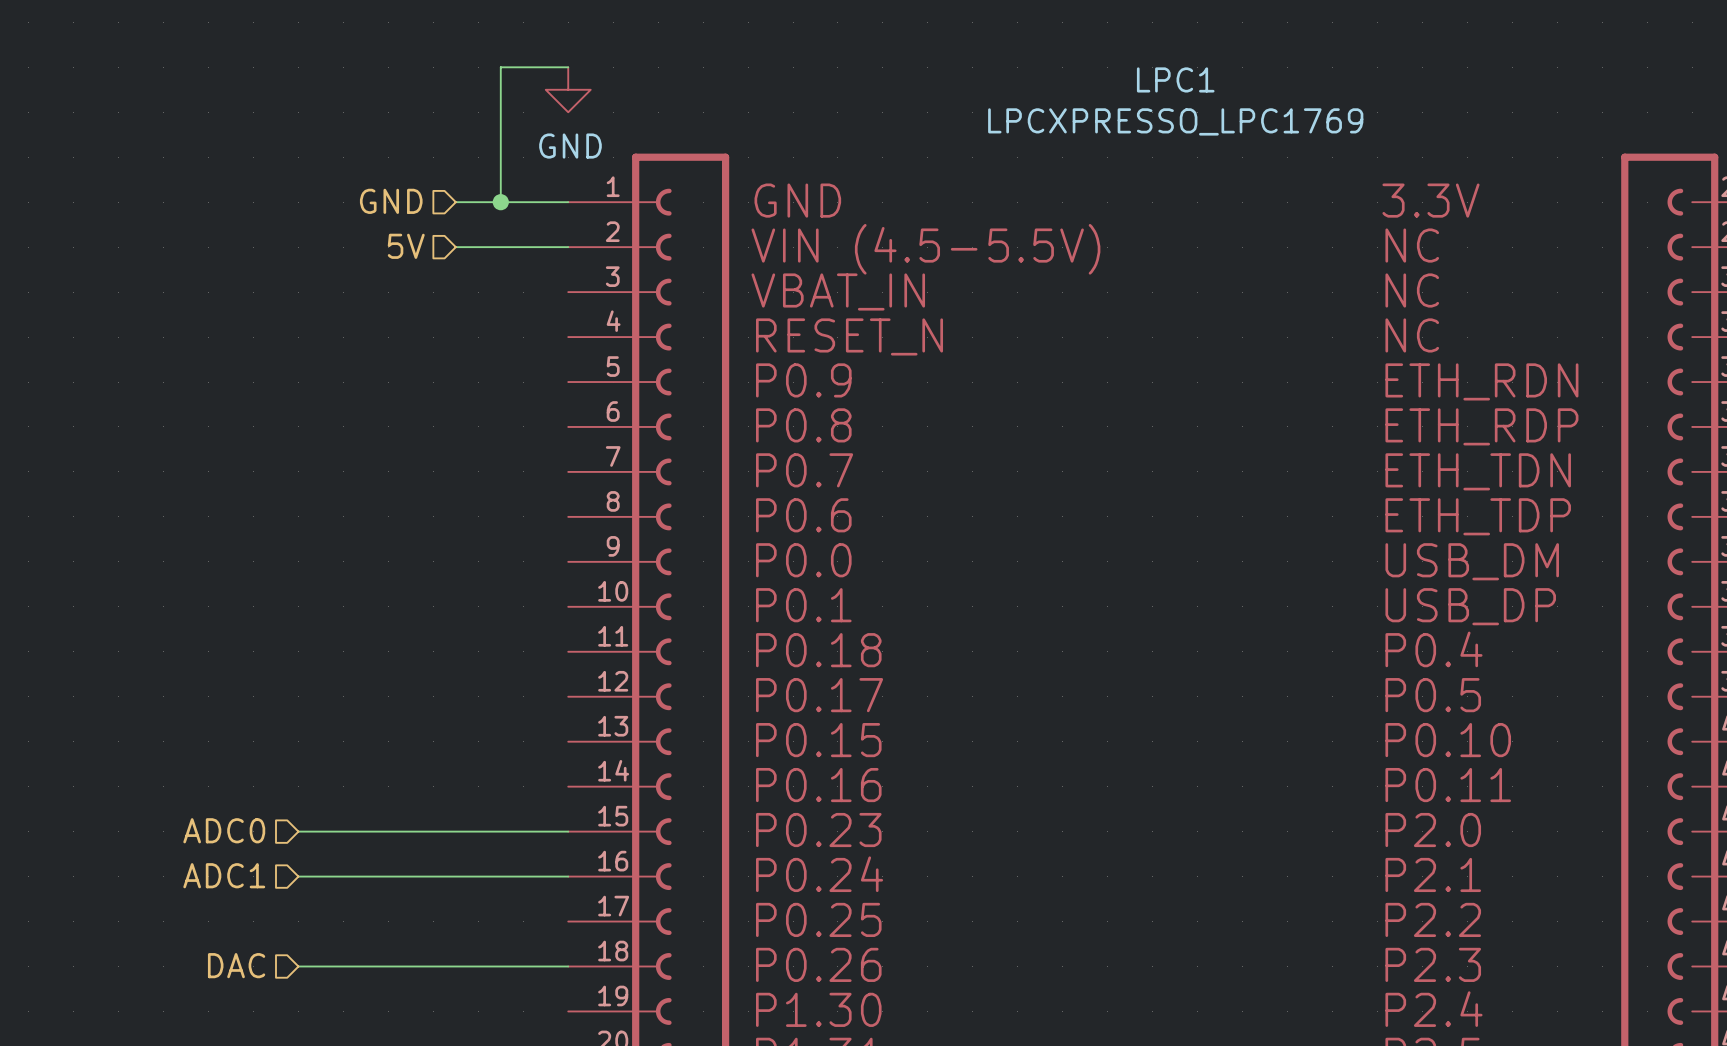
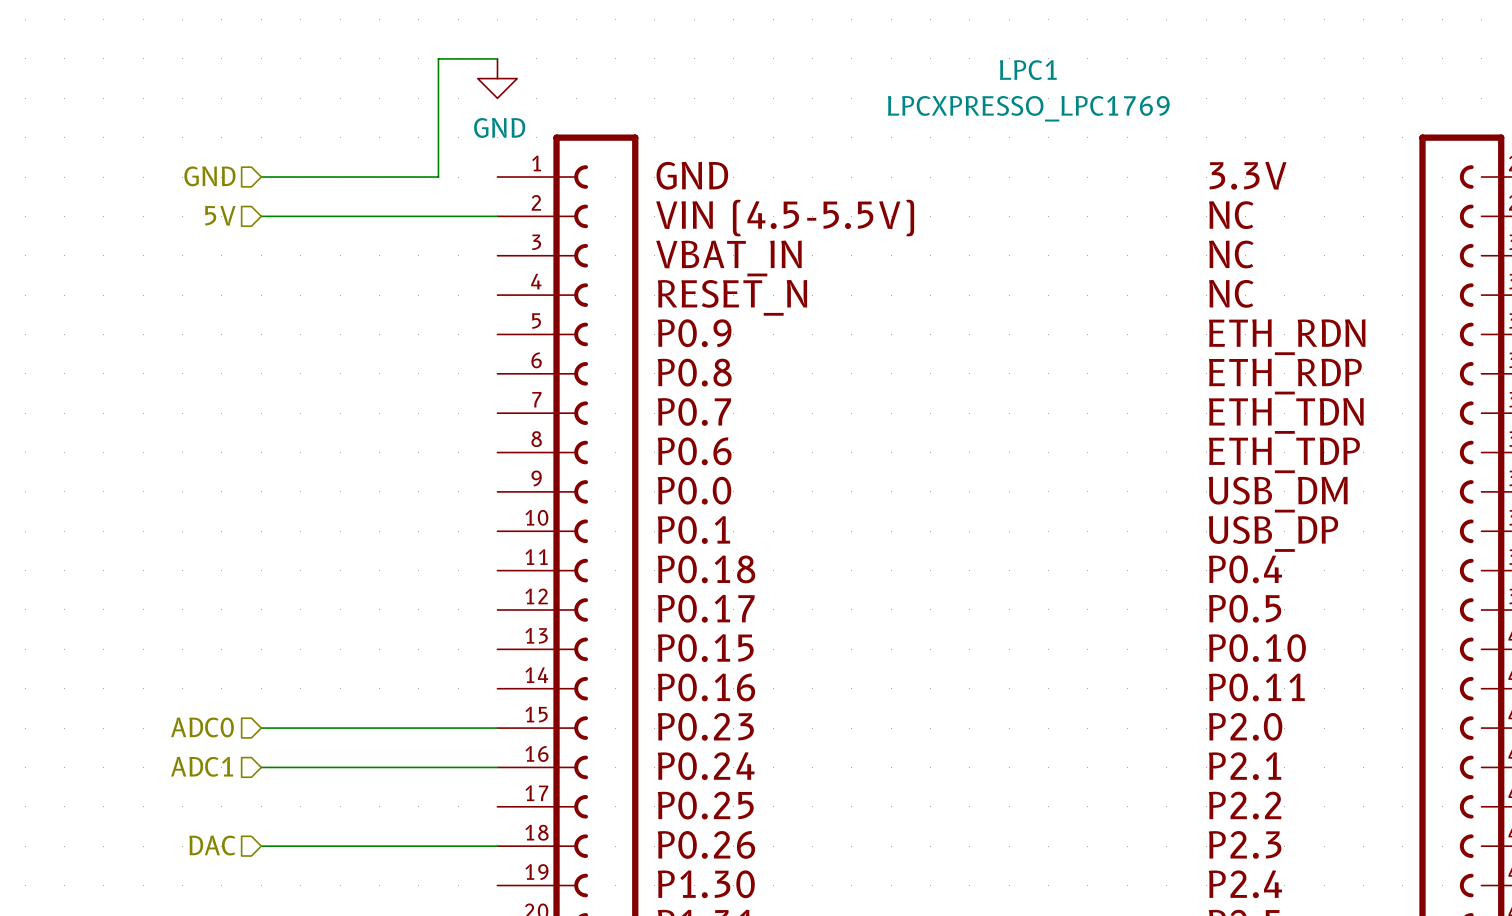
hierarchical label position: GND (391, 201) -> GND (209, 176)
wire: none -> (261, 177) (399, 177)
wire: (500, 202) (568, 202) -> none
junction: (500, 202) -> none
hierarchical label position: 5V (406, 246) -> 5V (220, 215)
wire: none -> (261, 216) (399, 216)

